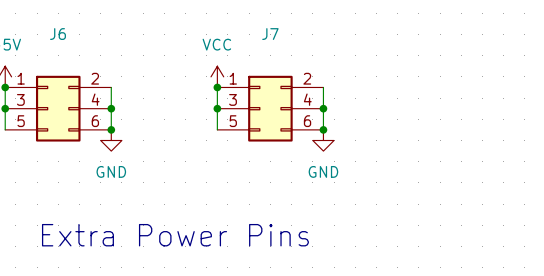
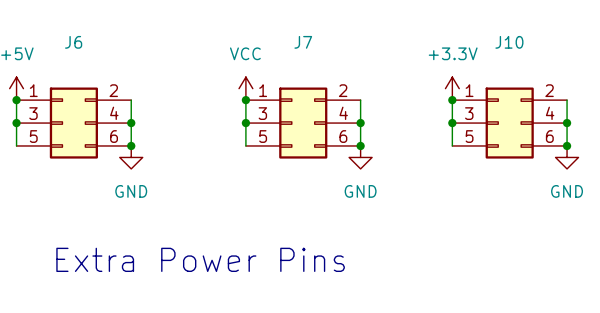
power symbol: none -> +3.3V (452, 88)
wire: none -> (452, 100) (452, 145)
junction: none -> (452, 100)
wire: none -> (567, 100) (567, 145)
junction: none -> (452, 123)
J10: none -> (509, 123)
junction: none -> (567, 123)
junction: none -> (567, 145)
power symbol: none -> GND (567, 157)

